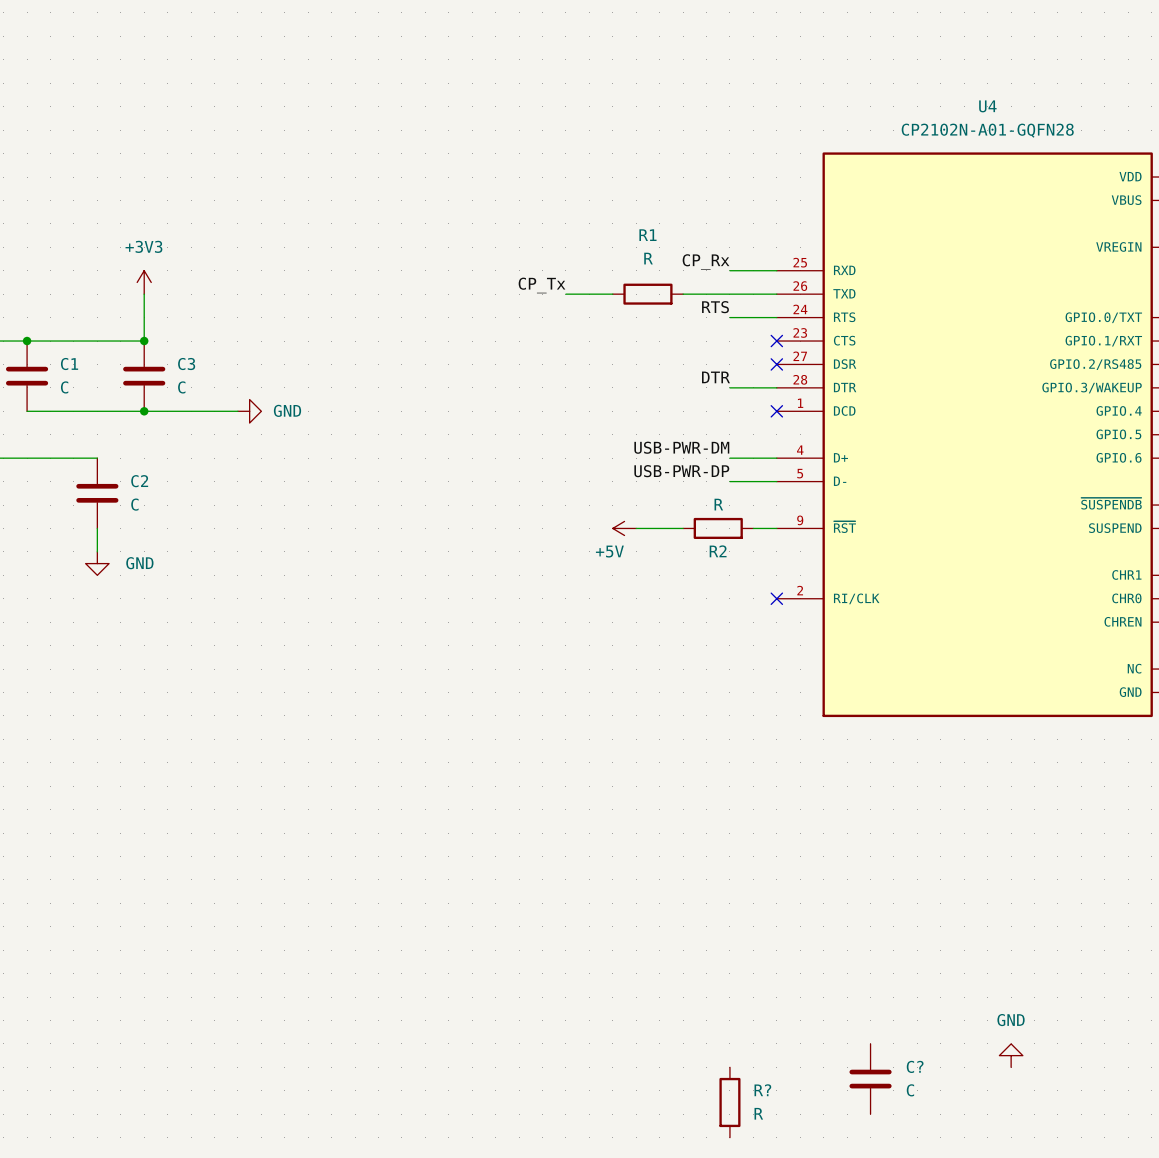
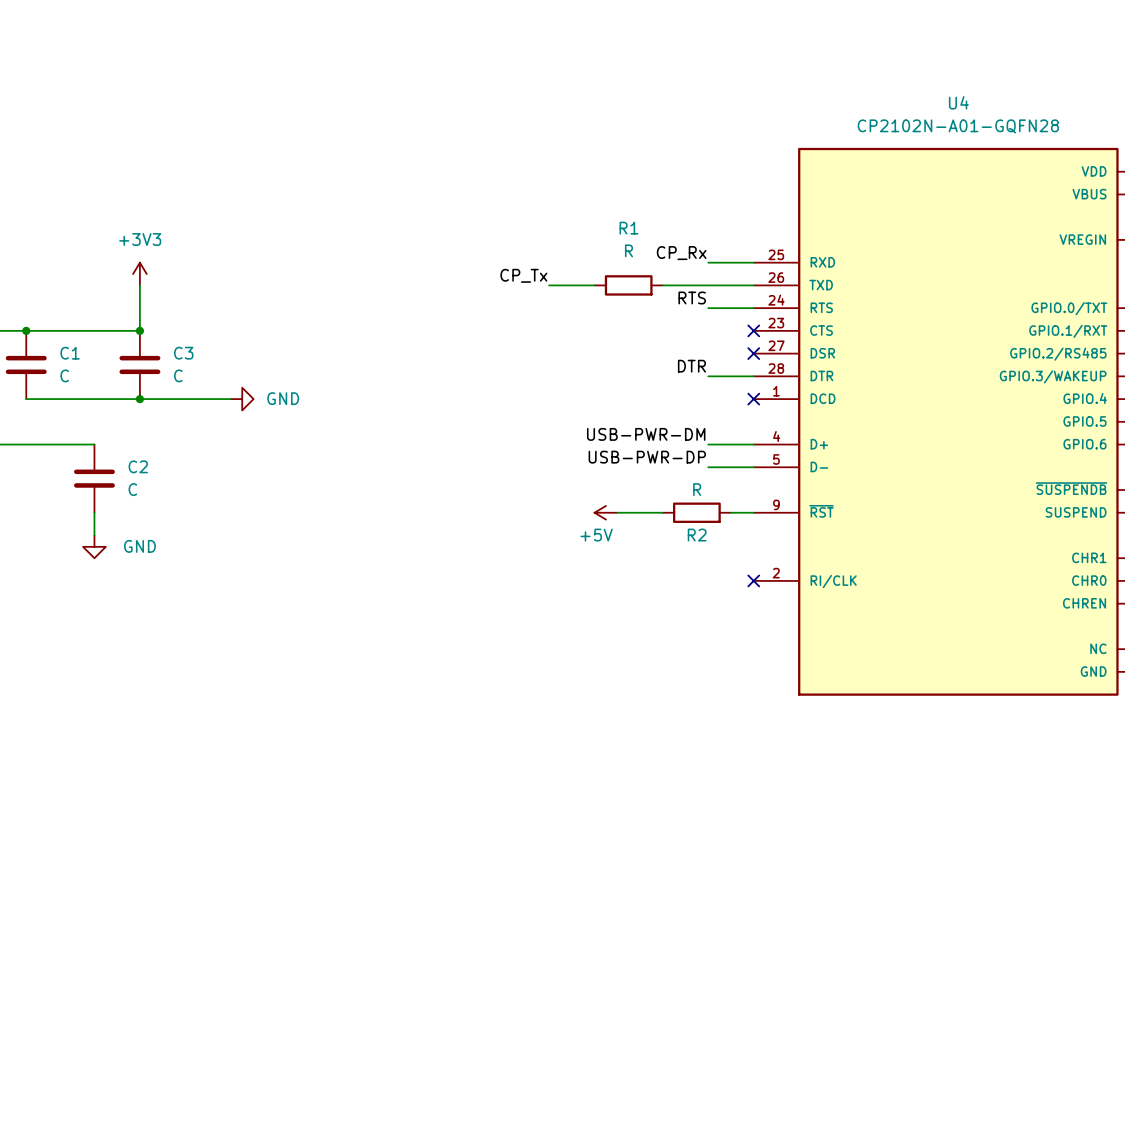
power symbol: GND (1011, 1055) -> none
C?: C (870, 1079) -> none
R?: R (729, 1102) -> none

